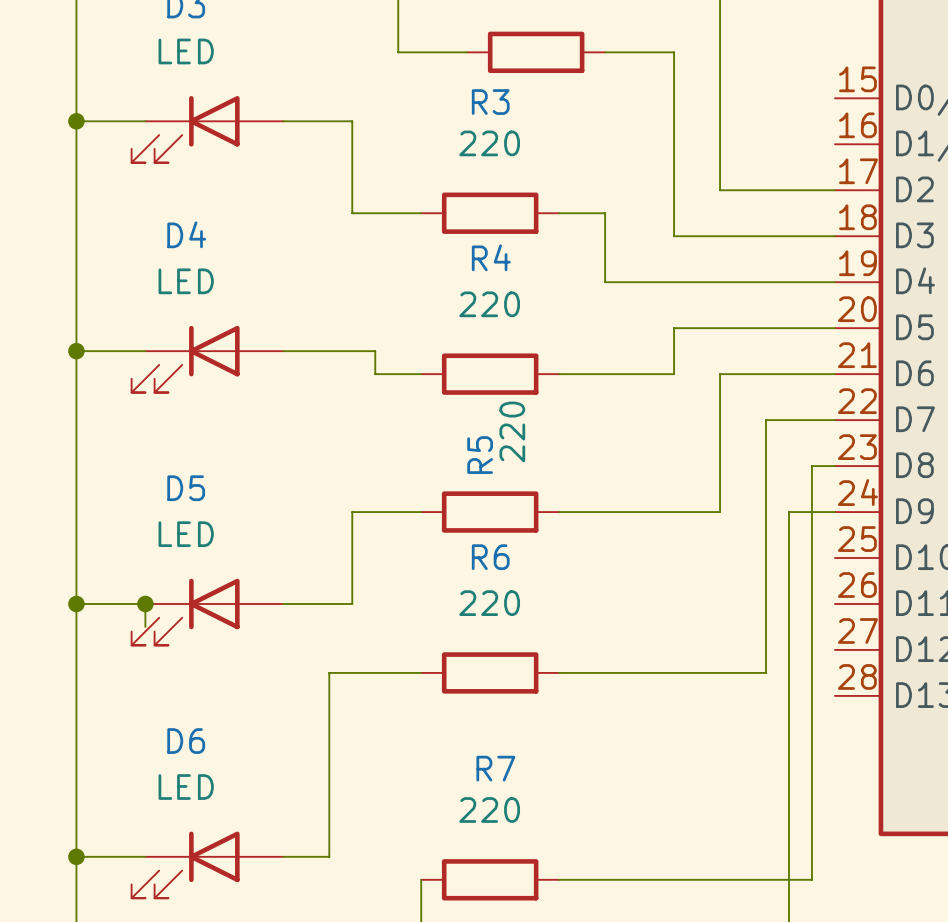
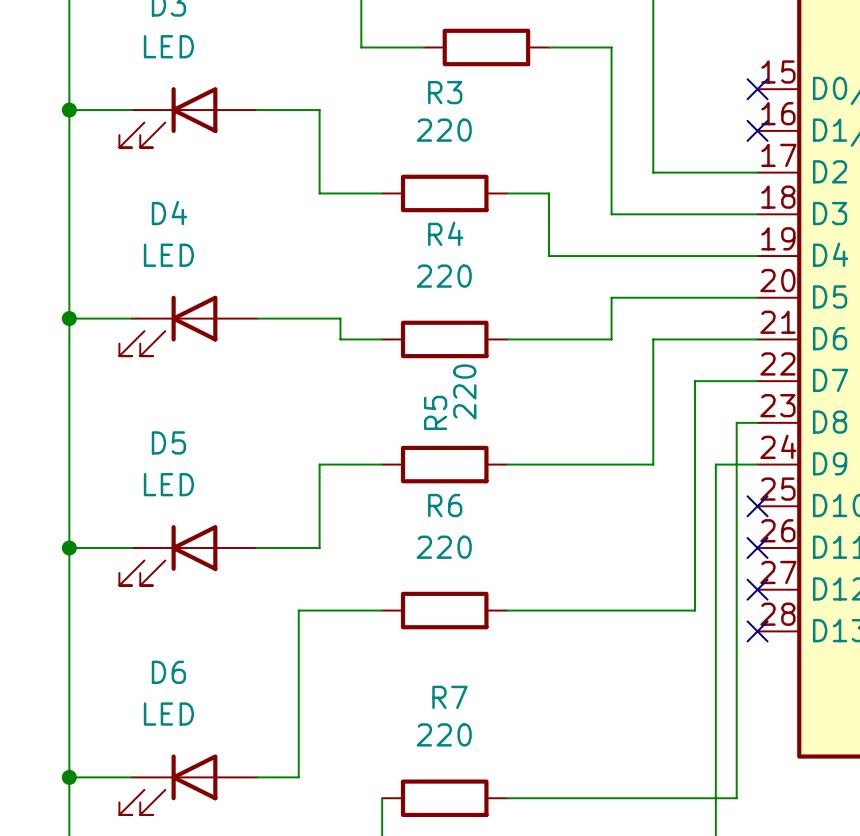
no-connect mark: none -> (757, 89)
no-connect mark: none -> (757, 130)
no-connect mark: none -> (757, 506)
wire: (145, 603) (145, 626) -> none
junction: (145, 603) -> none
no-connect mark: none -> (757, 547)
no-connect mark: none -> (757, 589)
no-connect mark: none -> (757, 631)

